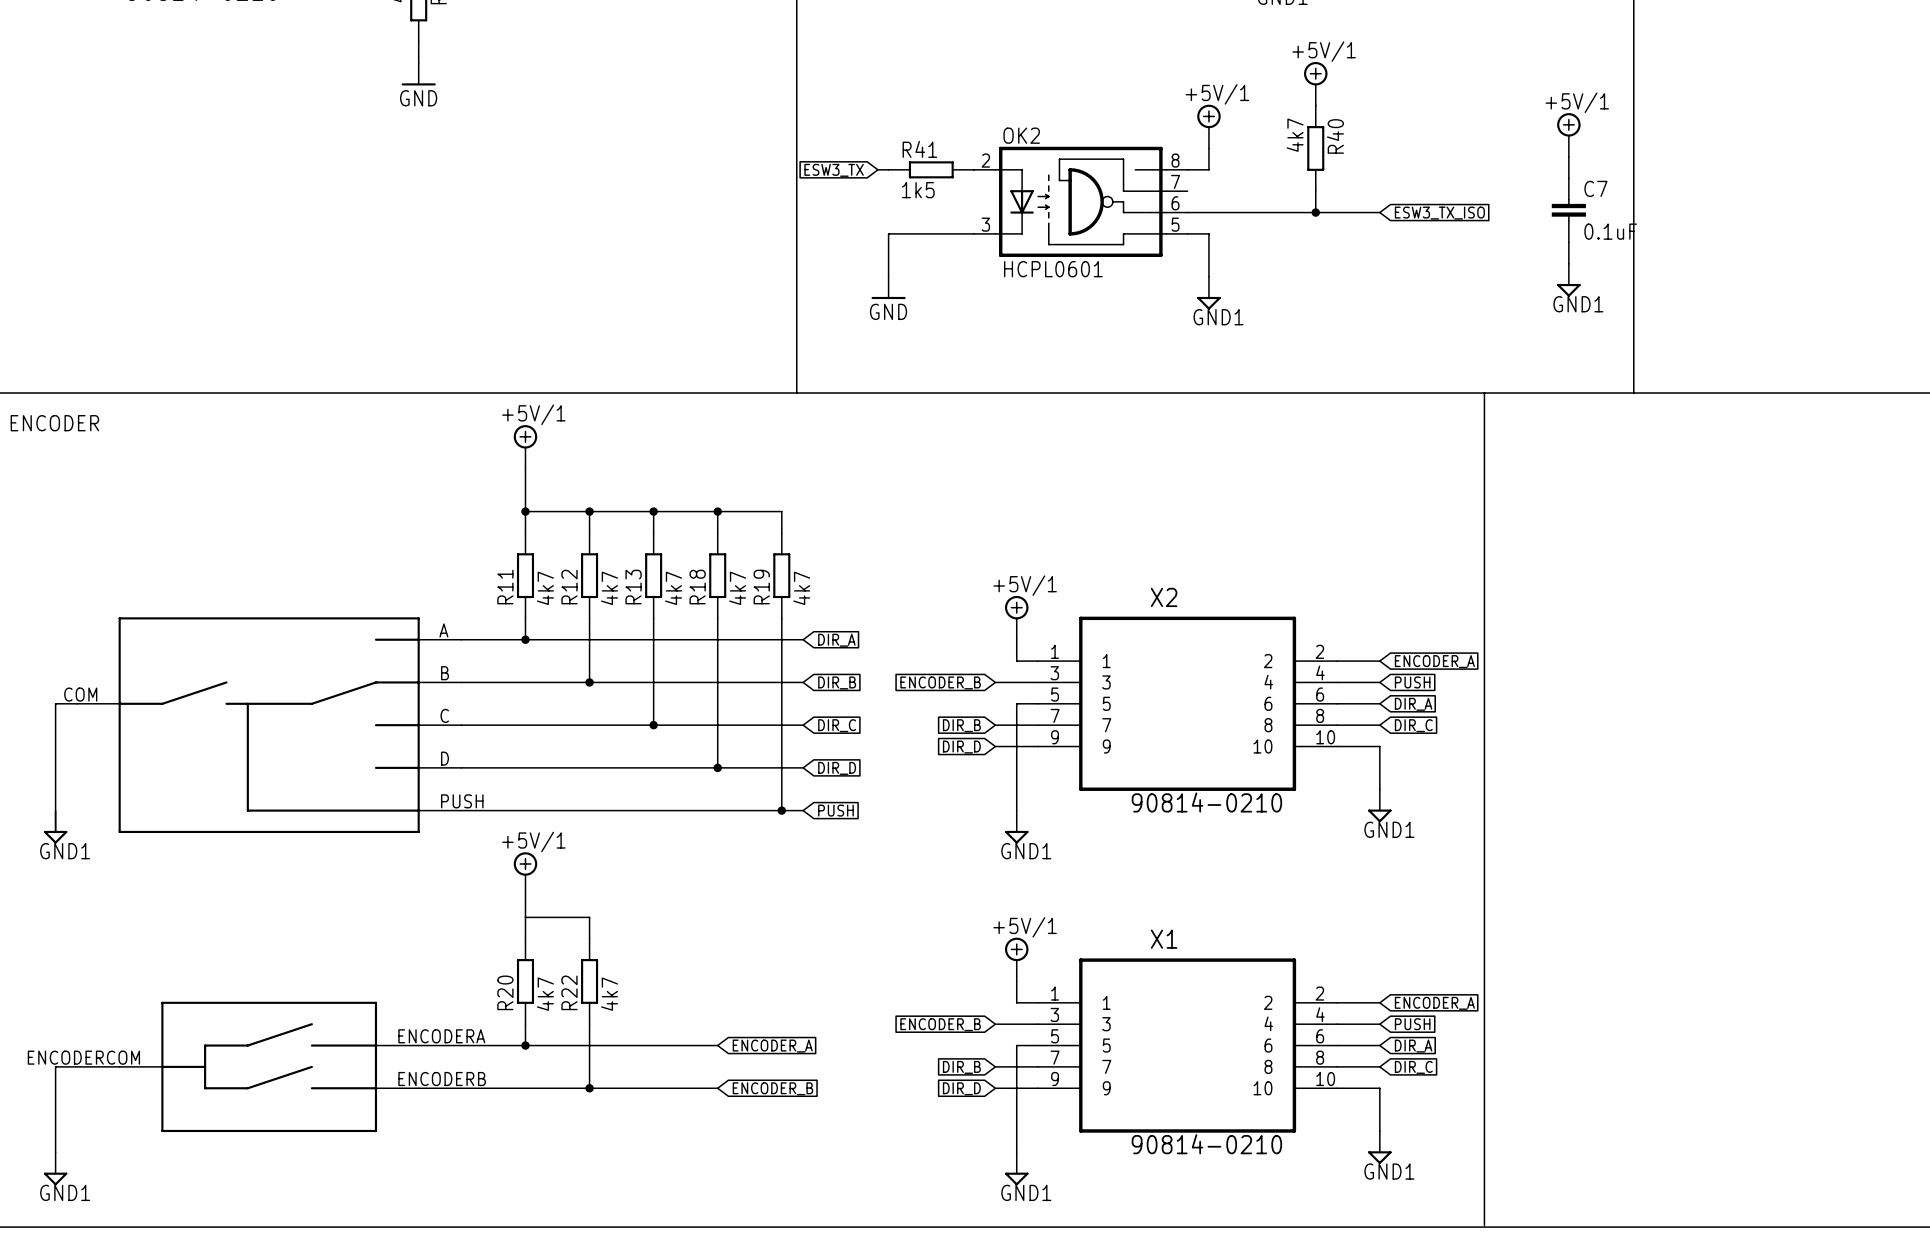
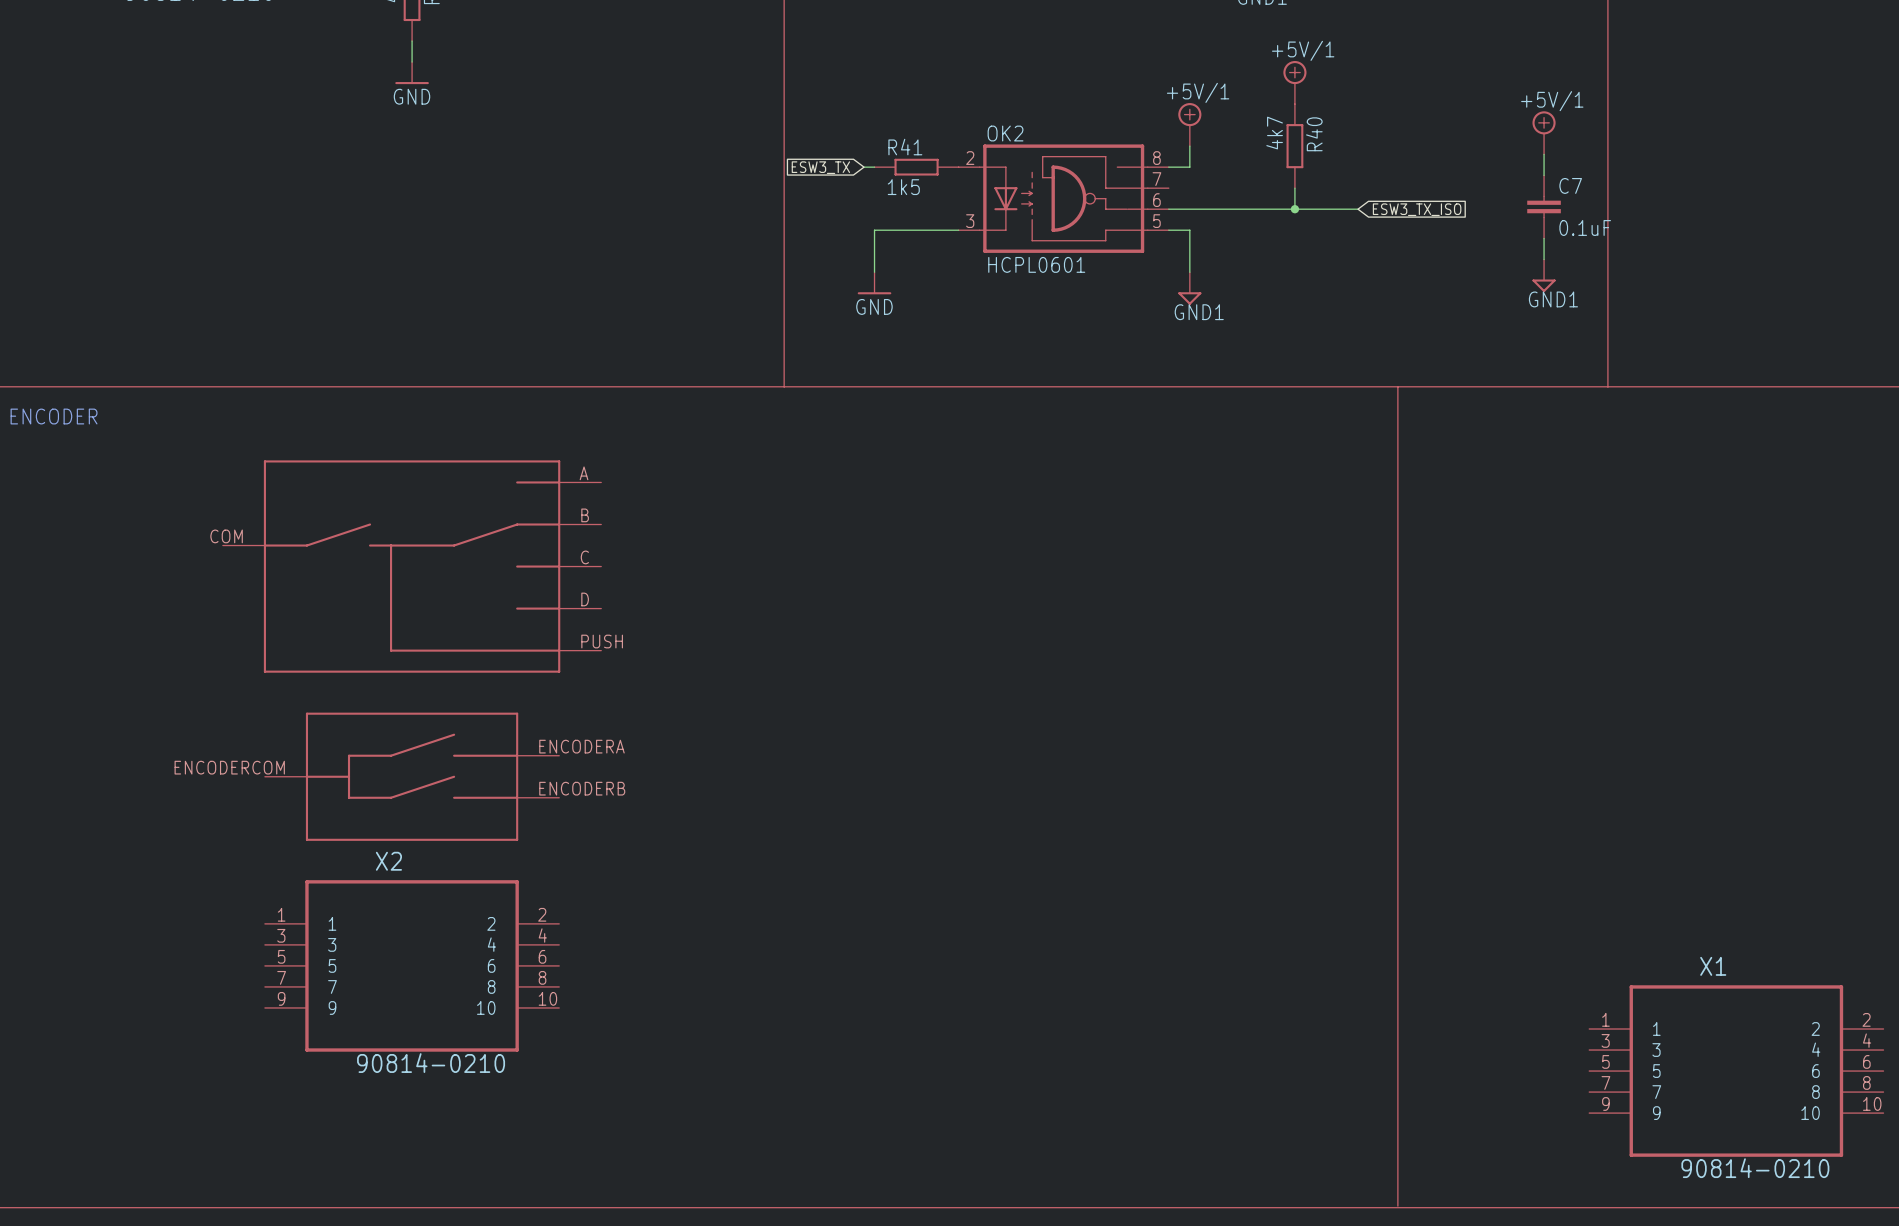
line: (1484, 393) (1484, 1225) -> (1397, 386) (1397, 1206)
power symbol: +5V/1 (525, 446) -> none
wire: (525, 468) (525, 532) -> none
wire: (525, 511) (781, 511) (781, 532) -> none
junction: (525, 511) -> none
wire: (589, 511) (589, 532) -> none
junction: (589, 511) -> none
wire: (653, 511) (653, 532) -> none
junction: (653, 511) -> none
wire: (717, 511) (717, 532) -> none
junction: (717, 511) -> none
part: none -> (412, 566)
R11: 4k7 (525, 575) -> none
R12: 4k7 (589, 575) -> none
R13: 4k7 (653, 575) -> none
R18: 4k7 (717, 575) -> none
R19: 4k7 (781, 575) -> none
power symbol: +5V/1 (1016, 617) -> none
wire: (525, 618) (525, 639) -> none
wire: (589, 618) (589, 682) -> none
wire: (653, 618) (653, 725) -> none
wire: (717, 618) (717, 767) -> none
wire: (781, 618) (781, 810) -> none
wire: (461, 639) (803, 639) -> none
junction: (525, 639) -> none
wire: (1016, 639) (1016, 661) (1038, 661) -> none
global label: DIR_A (836, 640) -> none
wire: (1337, 661) (1379, 661) -> none
global label: ENCODER_A (1434, 661) -> none
wire: (461, 682) (803, 682) -> none
junction: (589, 682) -> none
global label: DIR_B (837, 682) -> none
global label: ENCODER_B (940, 682) -> none
wire: (995, 682) (1038, 682) -> none
wire: (1337, 682) (1379, 682) -> none
global label: PUSH (1412, 682) -> none
wire: (76, 703) (55, 703) (55, 831) -> none
wire: (1038, 703) (1016, 703) (1016, 810) -> none
X2 position: (1187, 703) -> (412, 965)
wire: (1337, 703) (1379, 703) -> none
global label: DIR_A (1413, 704) -> none
part: (269, 725) -> none
wire: (461, 725) (803, 725) -> none
junction: (653, 725) -> none
global label: DIR_C (837, 725) -> none
global label: DIR_B (961, 725) -> none
wire: (995, 725) (1038, 725) -> none
wire: (1337, 725) (1379, 725) -> none
global label: DIR_C (1413, 725) -> none
wire: (995, 746) (1038, 746) -> none
wire: (1337, 746) (1379, 746) (1379, 789) -> none
global label: DIR_D (961, 747) -> none
wire: (461, 767) (803, 767) -> none
junction: (717, 767) -> none
global label: DIR_D (837, 768) -> none
part: none -> (412, 776)
power symbol: GND1 (1379, 805) -> none
wire: (461, 810) (803, 810) -> none
junction: (781, 810) -> none
global label: PUSH (835, 810) -> none
power symbol: GND1 (55, 827) -> none
power symbol: GND1 (1016, 827) -> none
power symbol: +5V/1 (525, 874) -> none
wire: (525, 917) (589, 917) (589, 938) -> none
power symbol: +5V/1 (1016, 959) -> none
R20: 4k7 (525, 981) -> none
R22: 4k7 (589, 981) -> none
wire: (1016, 981) (1016, 1002) (1038, 1002) -> none
wire: (1337, 1002) (1379, 1002) -> none
global label: ENCODER_A (1434, 1003) -> none
wire: (589, 1024) (589, 1088) -> none
global label: ENCODER_B (940, 1024) -> none
wire: (995, 1024) (1038, 1024) -> none
wire: (1337, 1024) (1379, 1024) -> none
global label: PUSH (1412, 1024) -> none
wire: (418, 1045) (717, 1045) -> none
junction: (525, 1045) -> none
wire: (1038, 1045) (1016, 1045) (1016, 1152) -> none
X1 position: (1187, 1045) -> (1736, 1071)
wire: (1337, 1045) (1379, 1045) -> none
global label: ENCODER_A (772, 1046) -> none
global label: DIR_A (1413, 1046) -> none
wire: (119, 1066) (55, 1066) (55, 1152) -> none
part: (269, 1066) -> none
wire: (995, 1066) (1038, 1066) -> none
wire: (1337, 1066) (1379, 1066) -> none
global label: DIR_B (961, 1067) -> none
global label: DIR_C (1413, 1067) -> none
wire: (418, 1088) (717, 1088) -> none
junction: (589, 1088) -> none
global label: ENCODER_B (772, 1088) -> none
global label: DIR_D (961, 1088) -> none
wire: (995, 1088) (1038, 1088) -> none
wire: (1337, 1088) (1379, 1088) (1379, 1130) -> none
power symbol: GND1 (1379, 1147) -> none
power symbol: GND1 (55, 1168) -> none
power symbol: GND1 (1016, 1168) -> none

